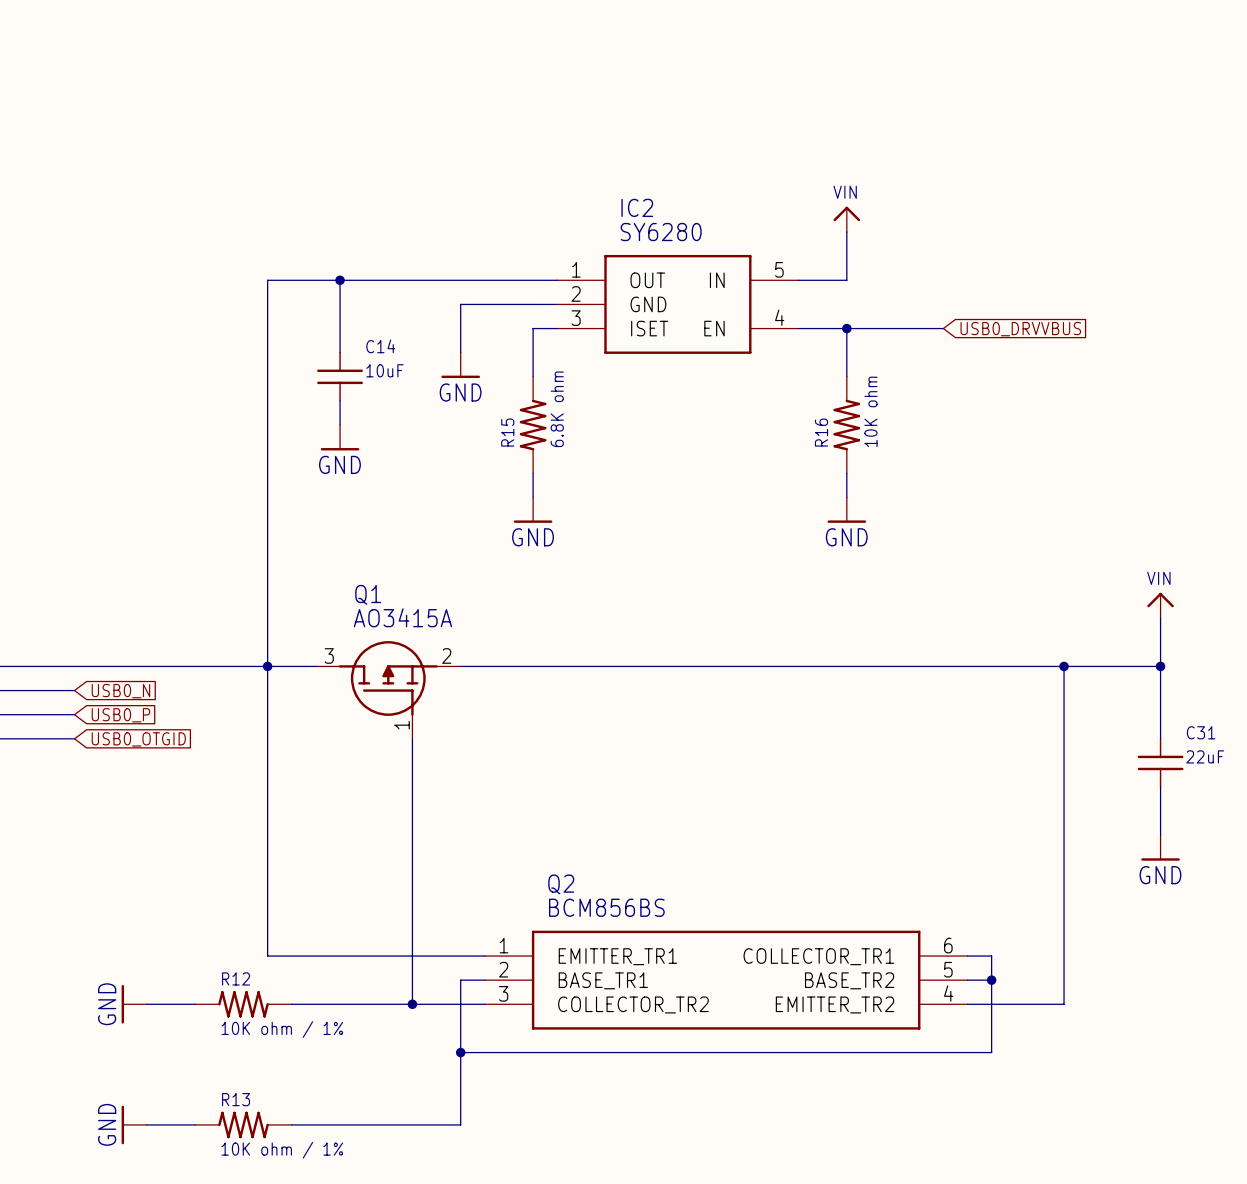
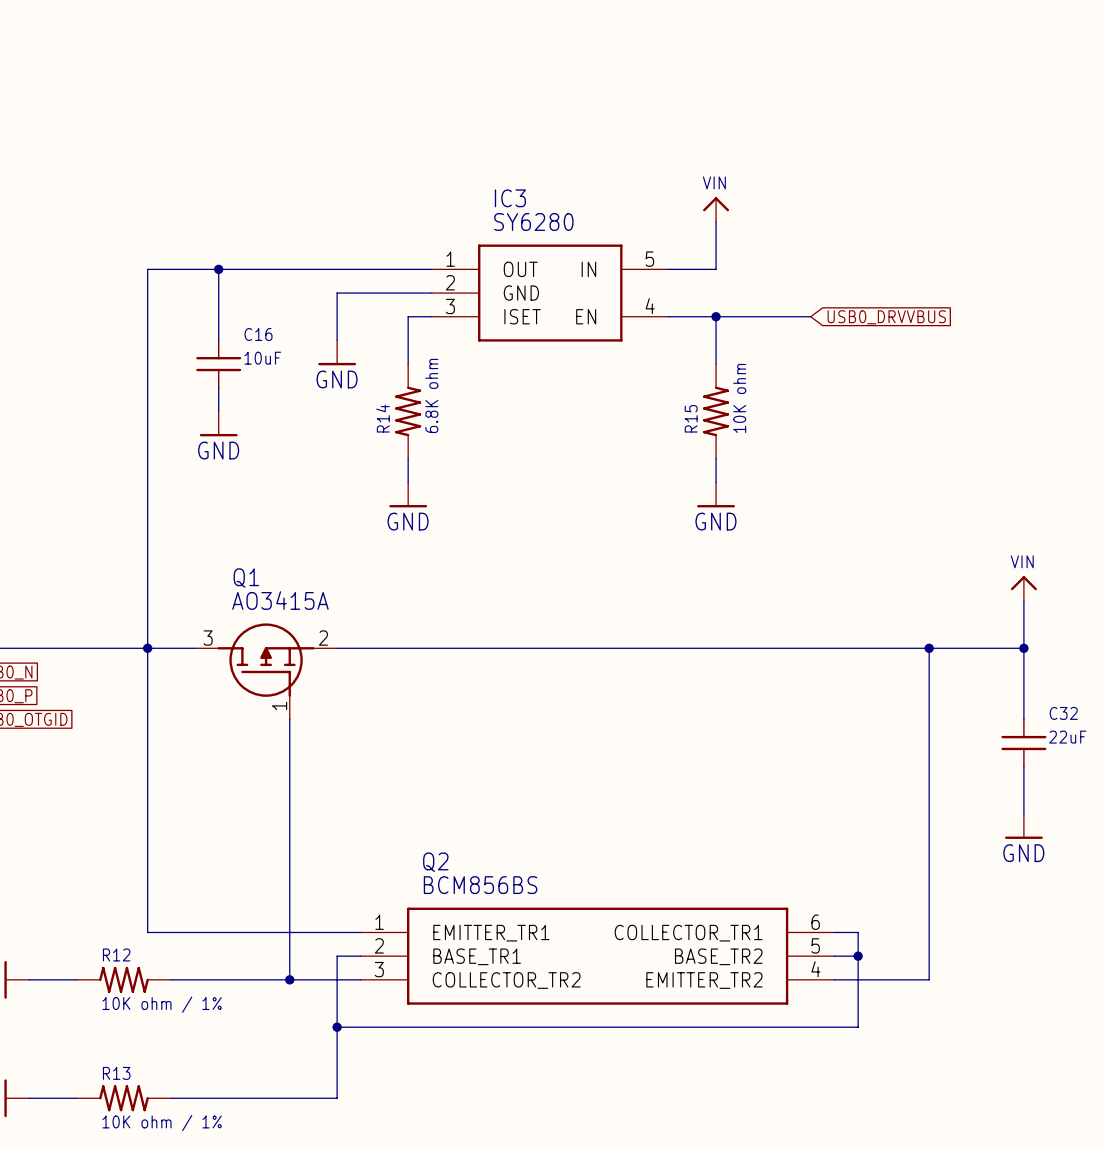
IC2 name: IC2 (637, 207) -> IC3 (510, 198)
C14 name: C14 (380, 346) -> C16 (258, 334)
R15 name: R15 (507, 432) -> R14 (383, 418)
R16 name: R16 (821, 432) -> R15 (691, 418)
C31 name: C31 (1201, 732) -> C32 (1063, 713)

